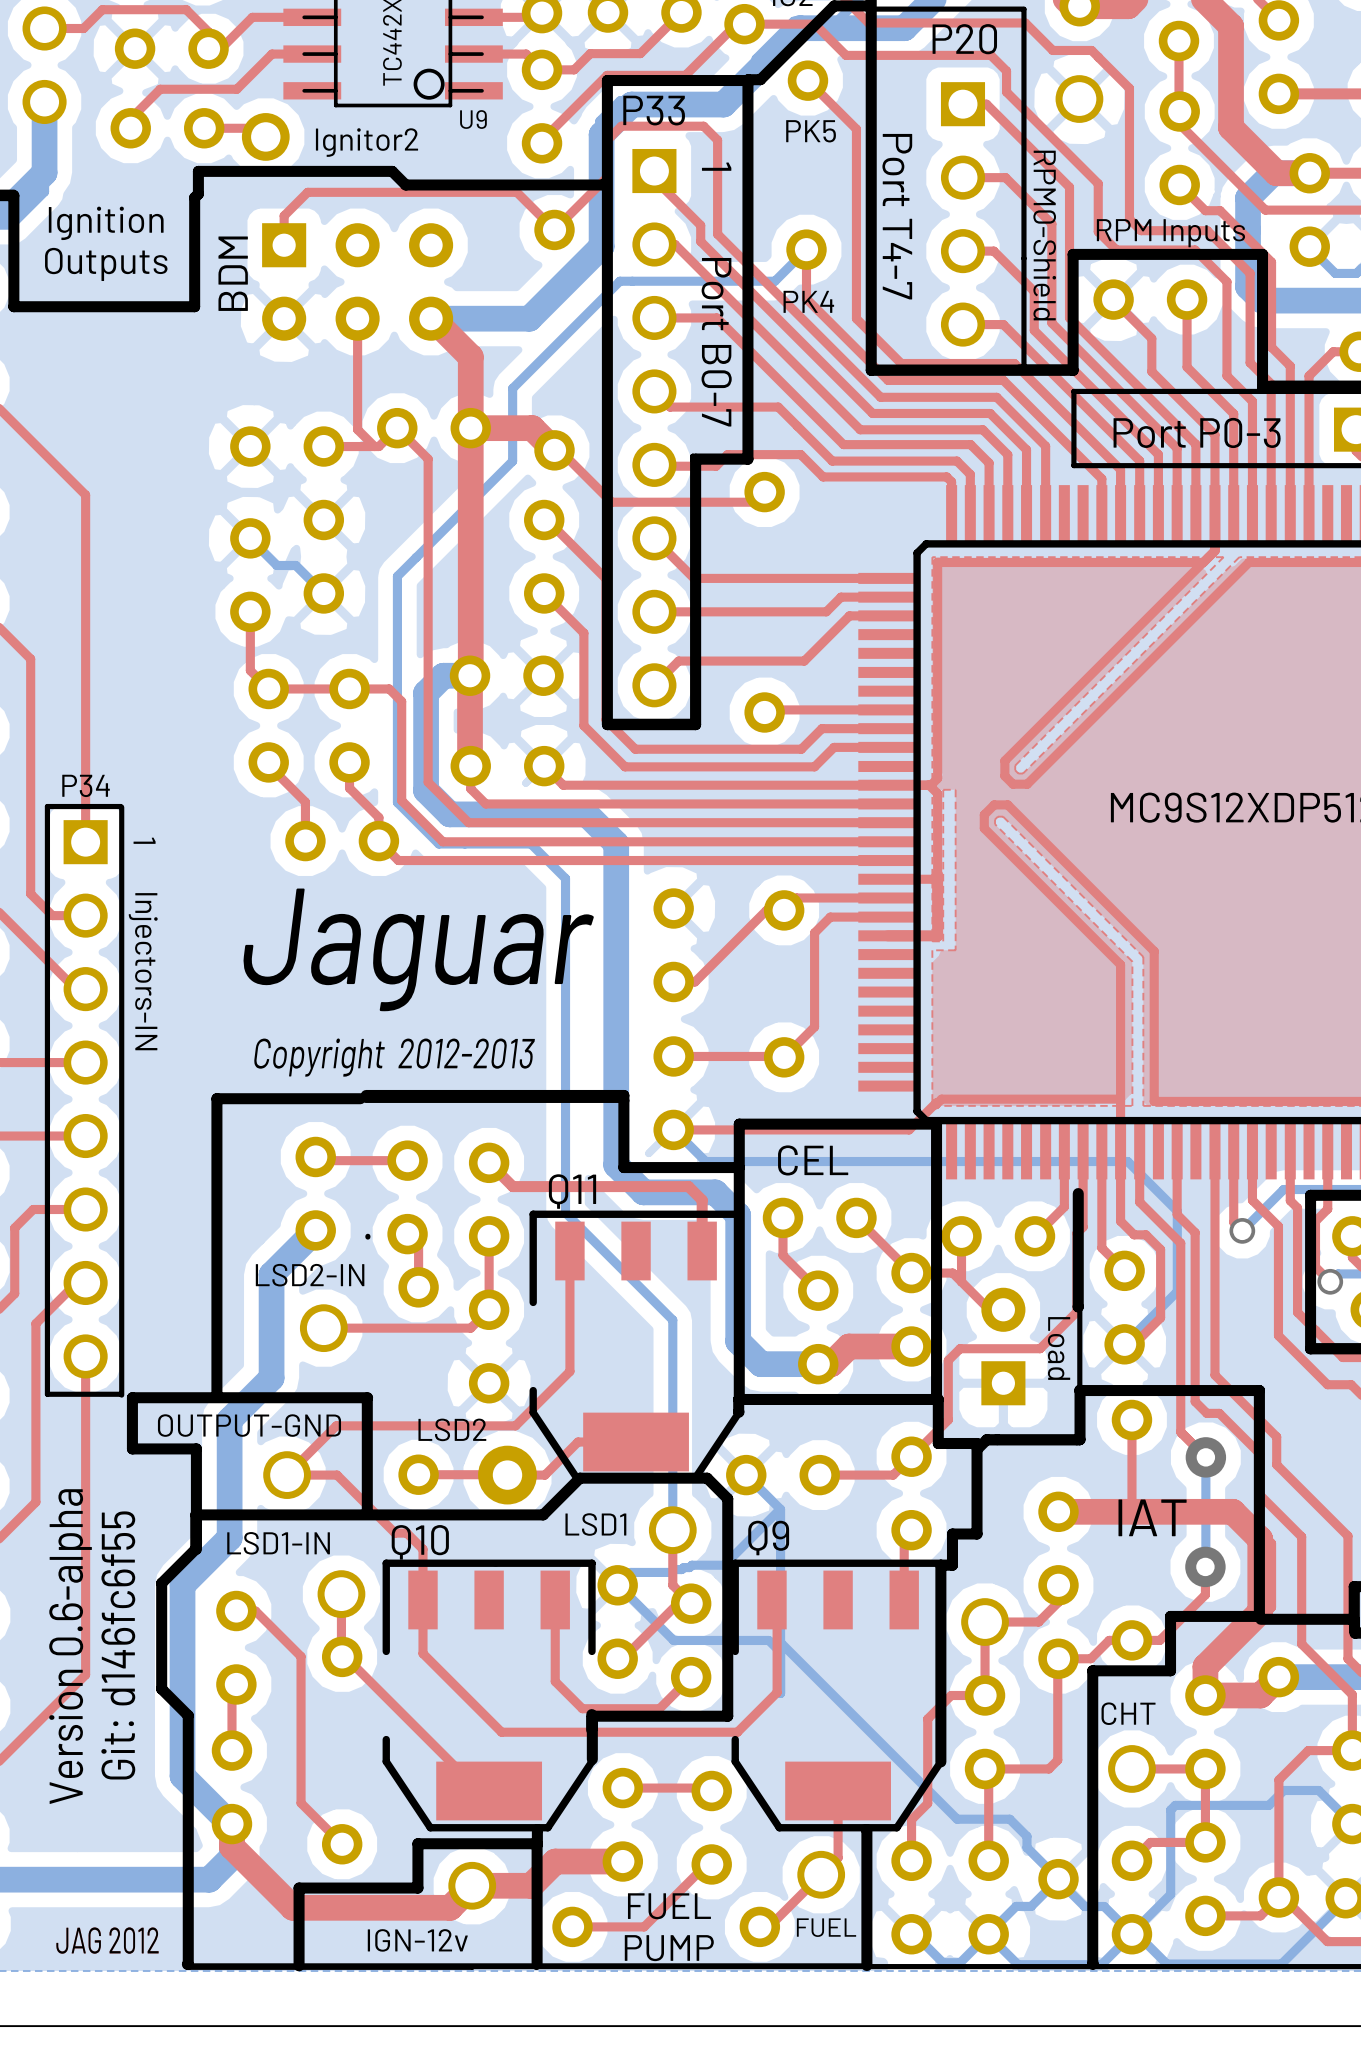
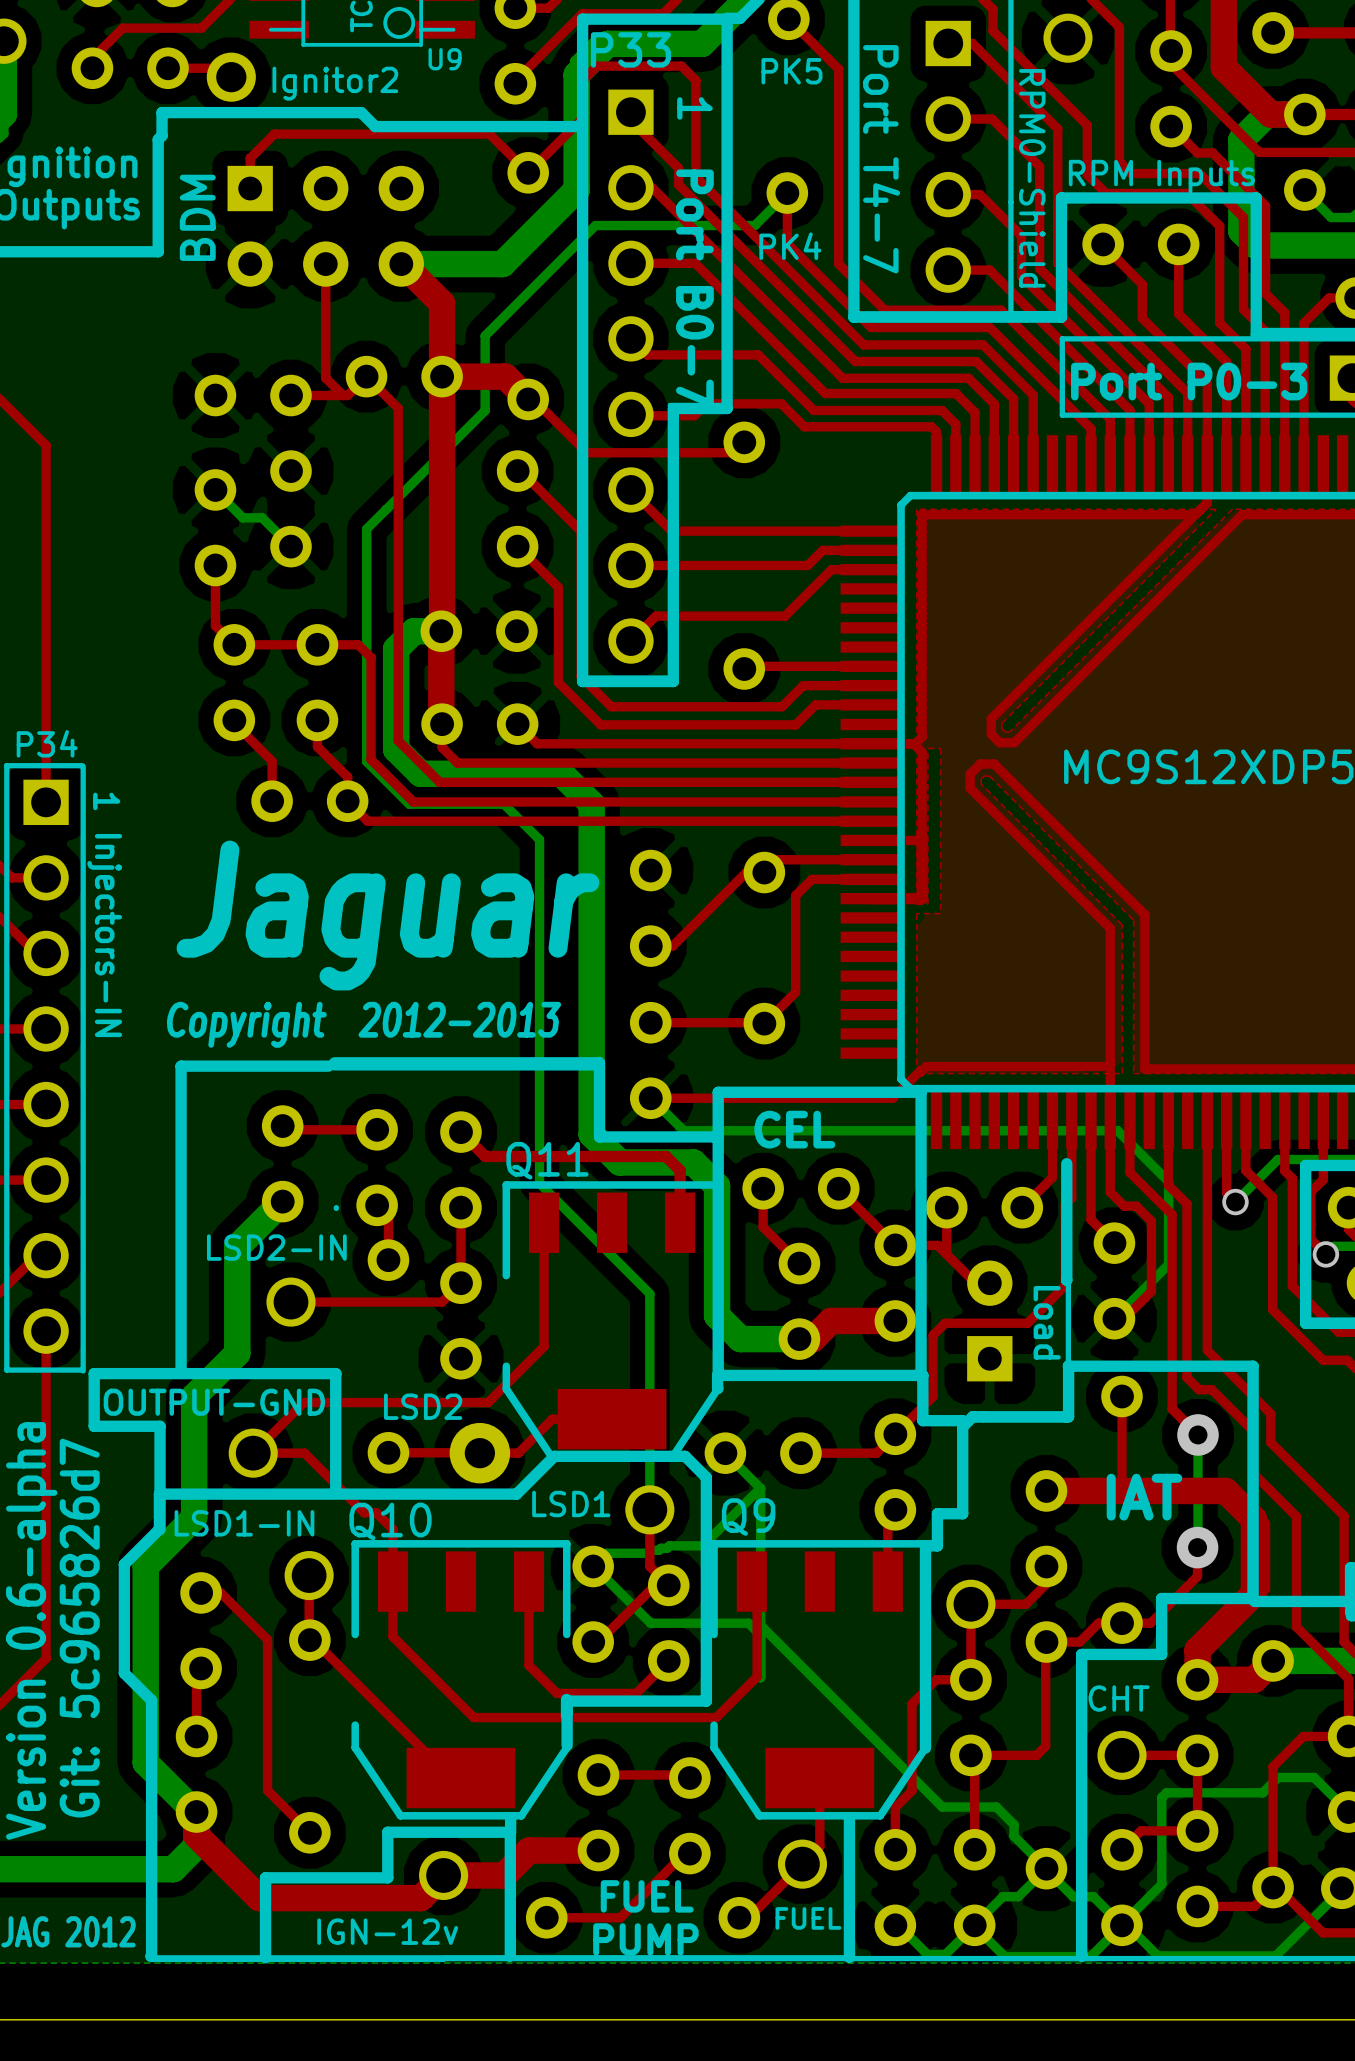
text: Git: d146fc6f55 (118, 1645) -> Git: 5c965826d7 (79, 1628)

